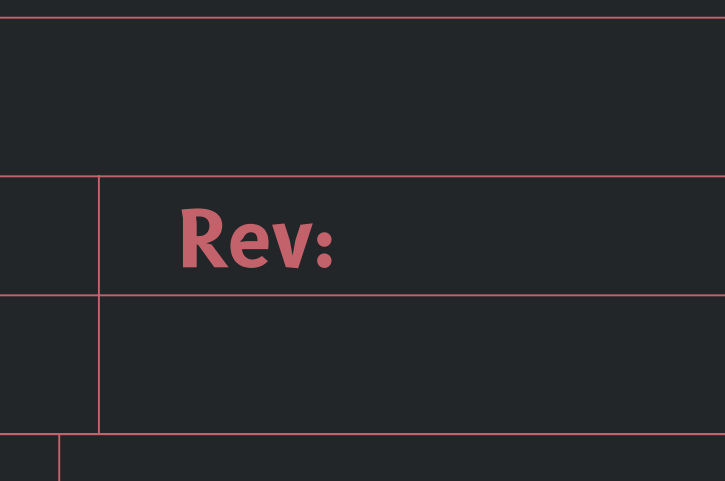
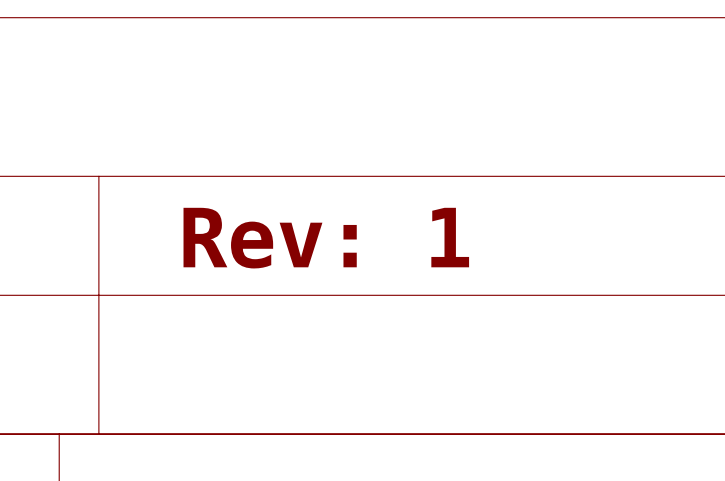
title block: Rev: (256, 238) -> Rev: 1 (326, 238)

